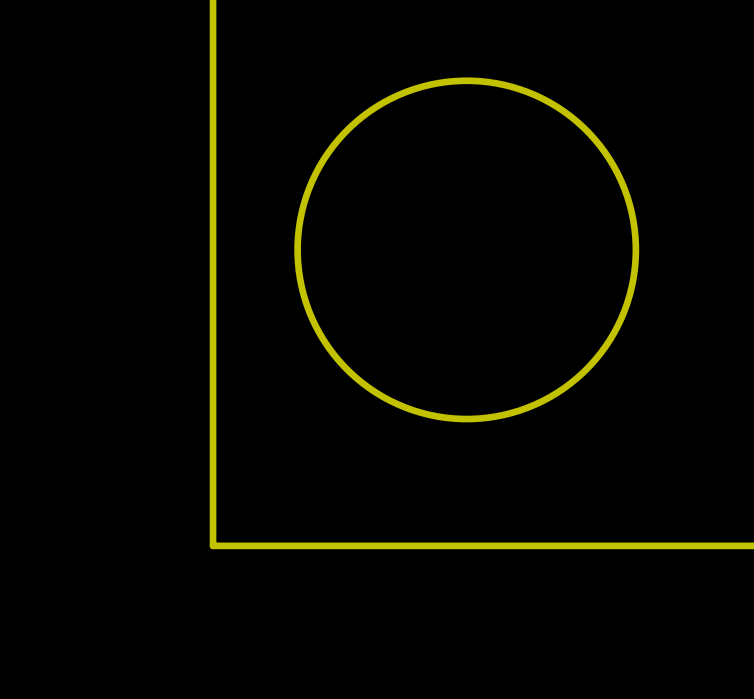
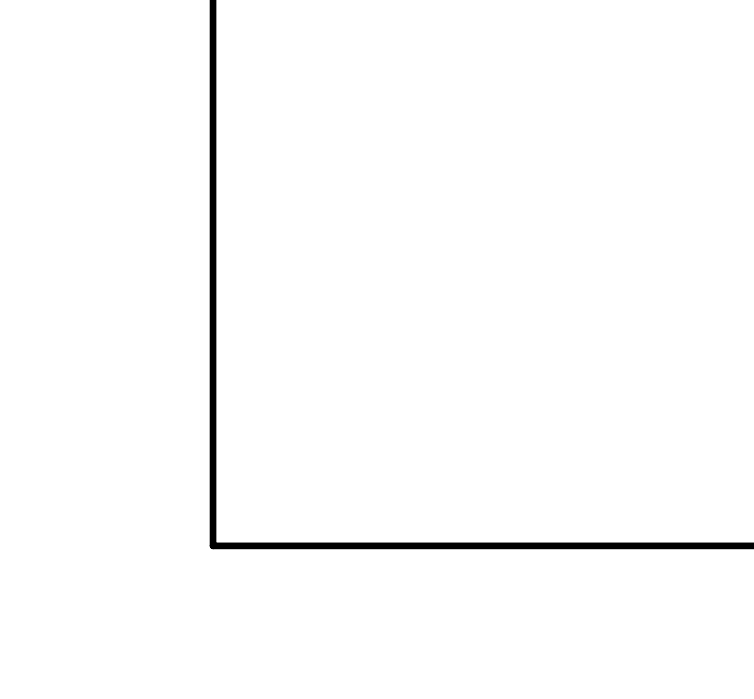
round board edge: [294, 77, 640, 423] -> none

